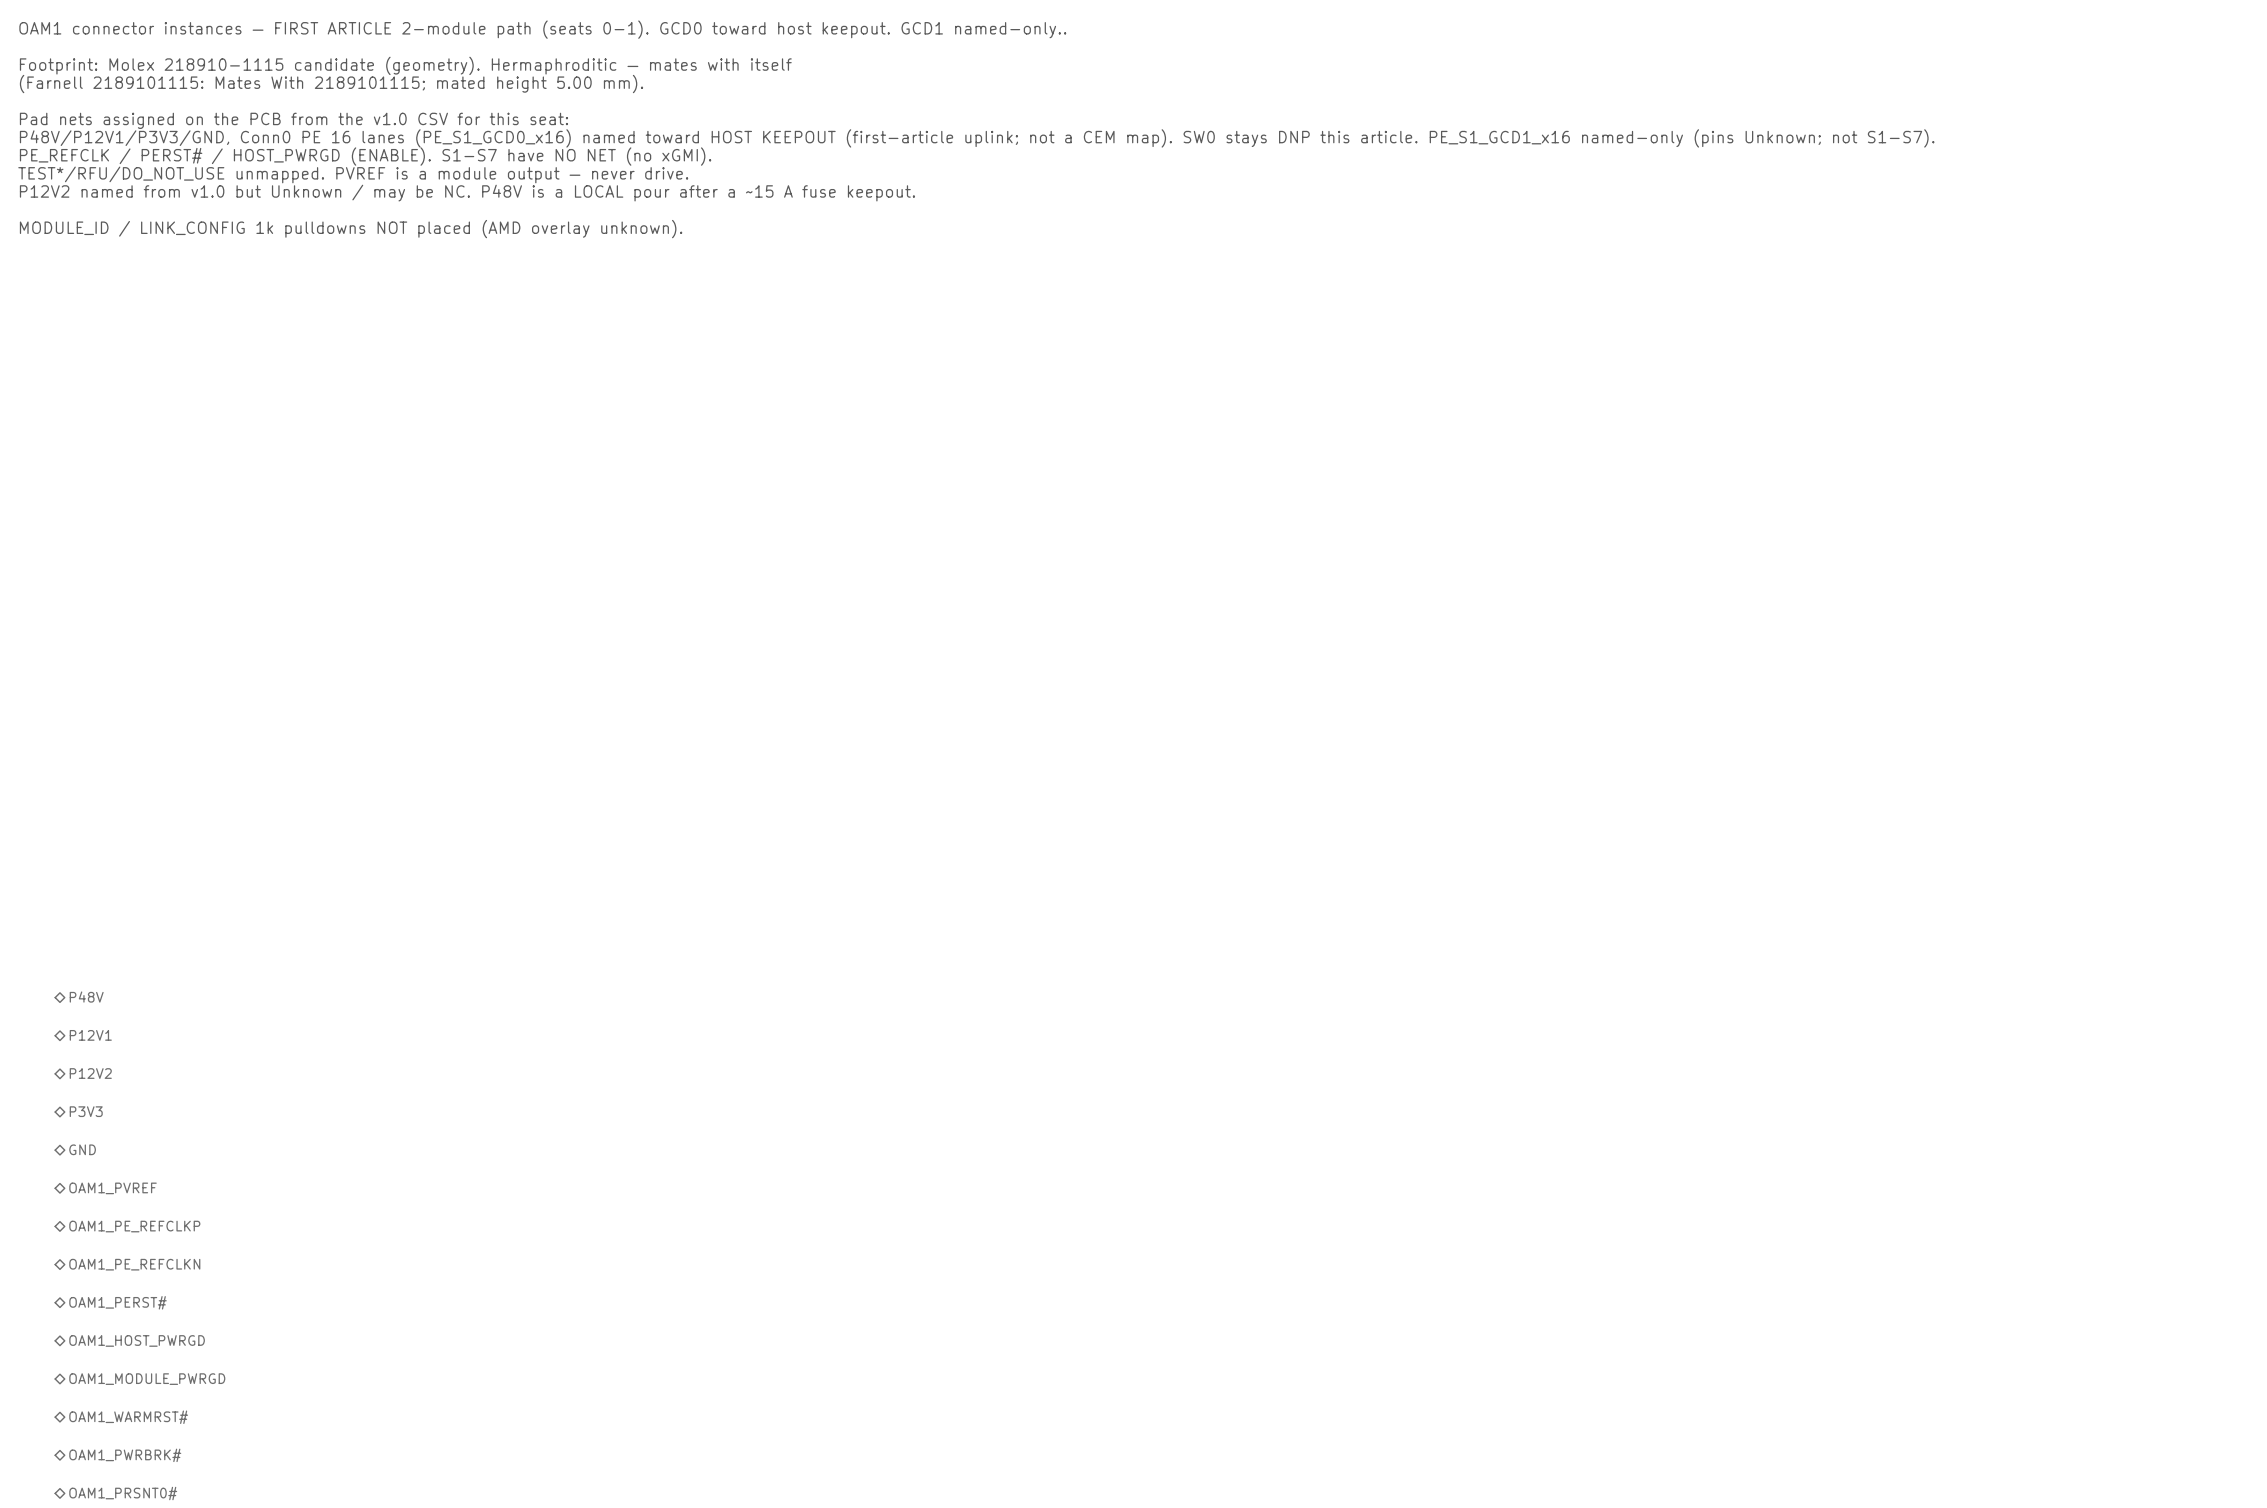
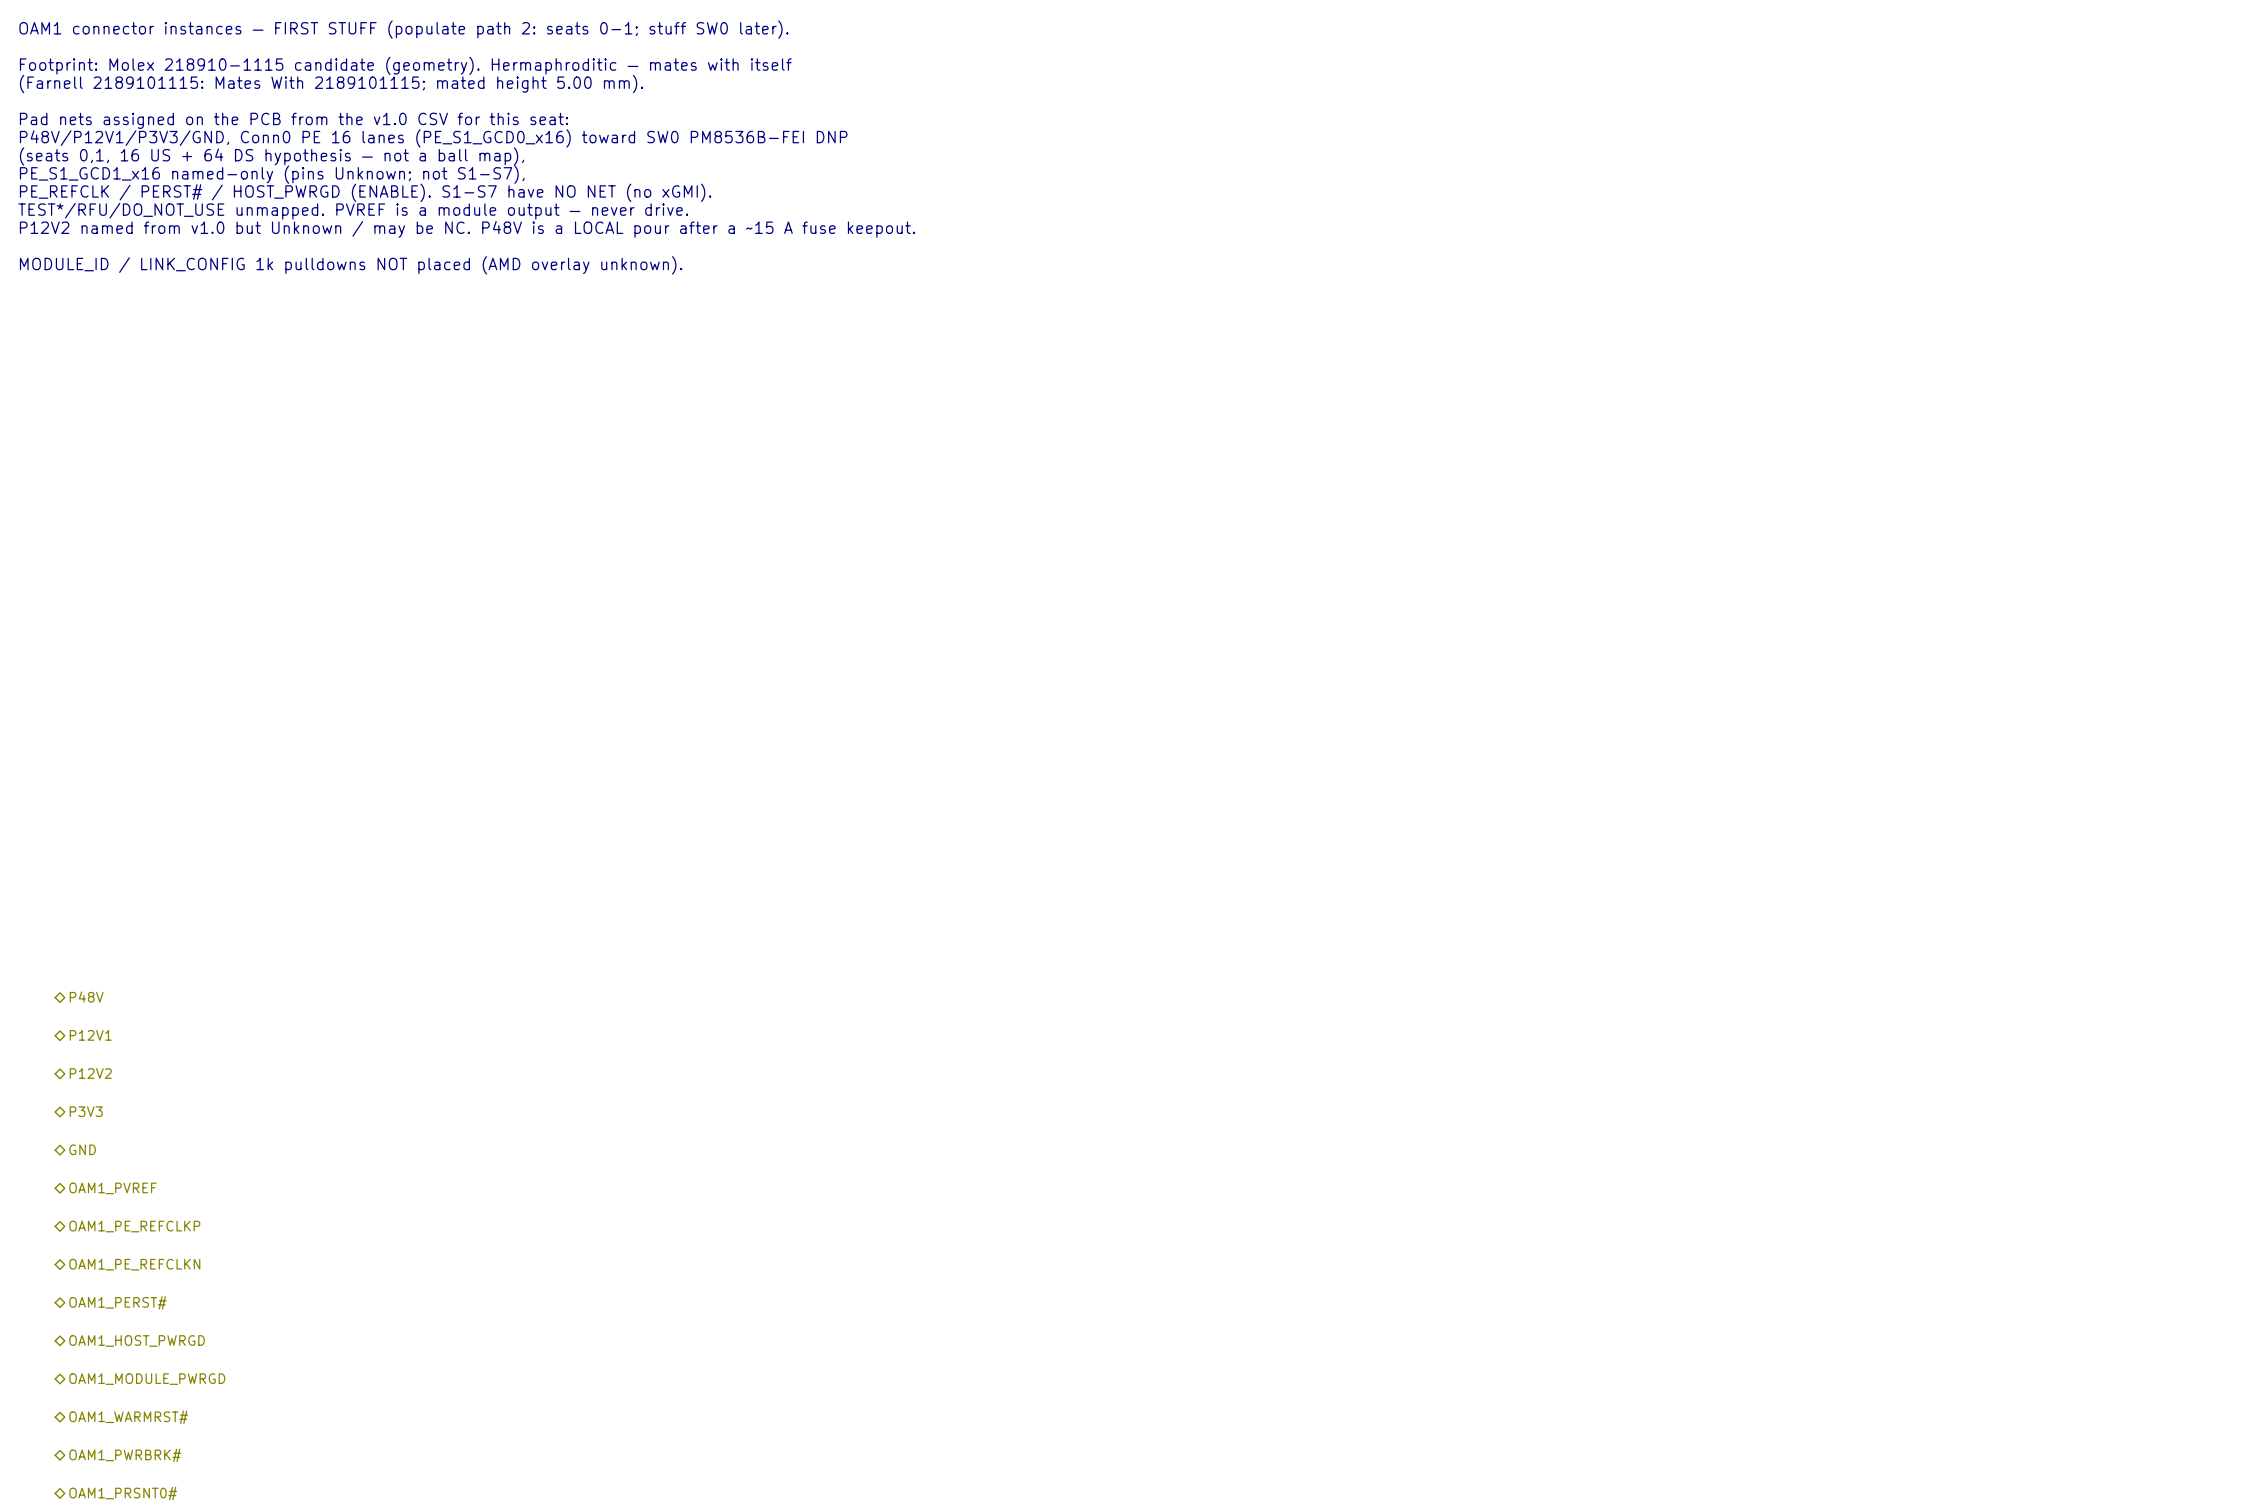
text: OAM1 connector instances — FIRST ARTICLE 2-module path (seats 0-1). GCD0 toward host keepout. GCD1 named-only.. (542, 29) -> OAM1 connector instances — FIRST STUFF (populate path 2: seats 0-1; stuff SW0 later). (403, 29)
text: P48V/P12V1/P3V3/GND, Conn0 PE 16 lanes (PE_S1_GCD0_x16) named toward HOST KEEPOUT (first-article uplink; not a CEM map). SW0 stays DNP this article. PE_S1_GCD1_x16 named-only (pins Unknown; not S1-S7). (977, 138) -> P48V/P12V1/P3V3/GND, Conn0 PE 16 lanes (PE_S1_GCD0_x16) toward SW0 PM8536B-FEI DNP (433, 138)
text: PE_REFCLK / PERST# / HOST_PWRGD (ENABLE). S1-S7 have NO NET (no xGMI). (365, 156) -> (seats 0,1, 16 US + 64 DS hypothesis — not a ball map), (272, 156)
text: TEST*/RFU/DO_NOT_USE unmapped. PVREF is a module output — never drive. (353, 174) -> PE_S1_GCD1_x16 named-only (pins Unknown; not S1-S7), (272, 174)
text: P12V2 named from v1.0 but Unknown / may be NC. P48V is a LOCAL pour after a ~15 A fuse keepout. (467, 193) -> PE_REFCLK / PERST# / HOST_PWRGD (ENABLE). S1-S7 have NO NET (no xGMI). (365, 192)
text: none -> TEST*/RFU/DO_NOT_USE unmapped. PVREF is a module output — never drive. (353, 211)
text: MODULE_ID / LINK_CONFIG 1k pulldowns NOT placed (AMD overlay unknown). (351, 229) -> P12V2 named from v1.0 but Unknown / may be NC. P48V is a LOCAL pour after a ~15 A fuse keepout. (467, 229)
text: none -> MODULE_ID / LINK_CONFIG 1k pulldowns NOT placed (AMD overlay unknown). (351, 265)

